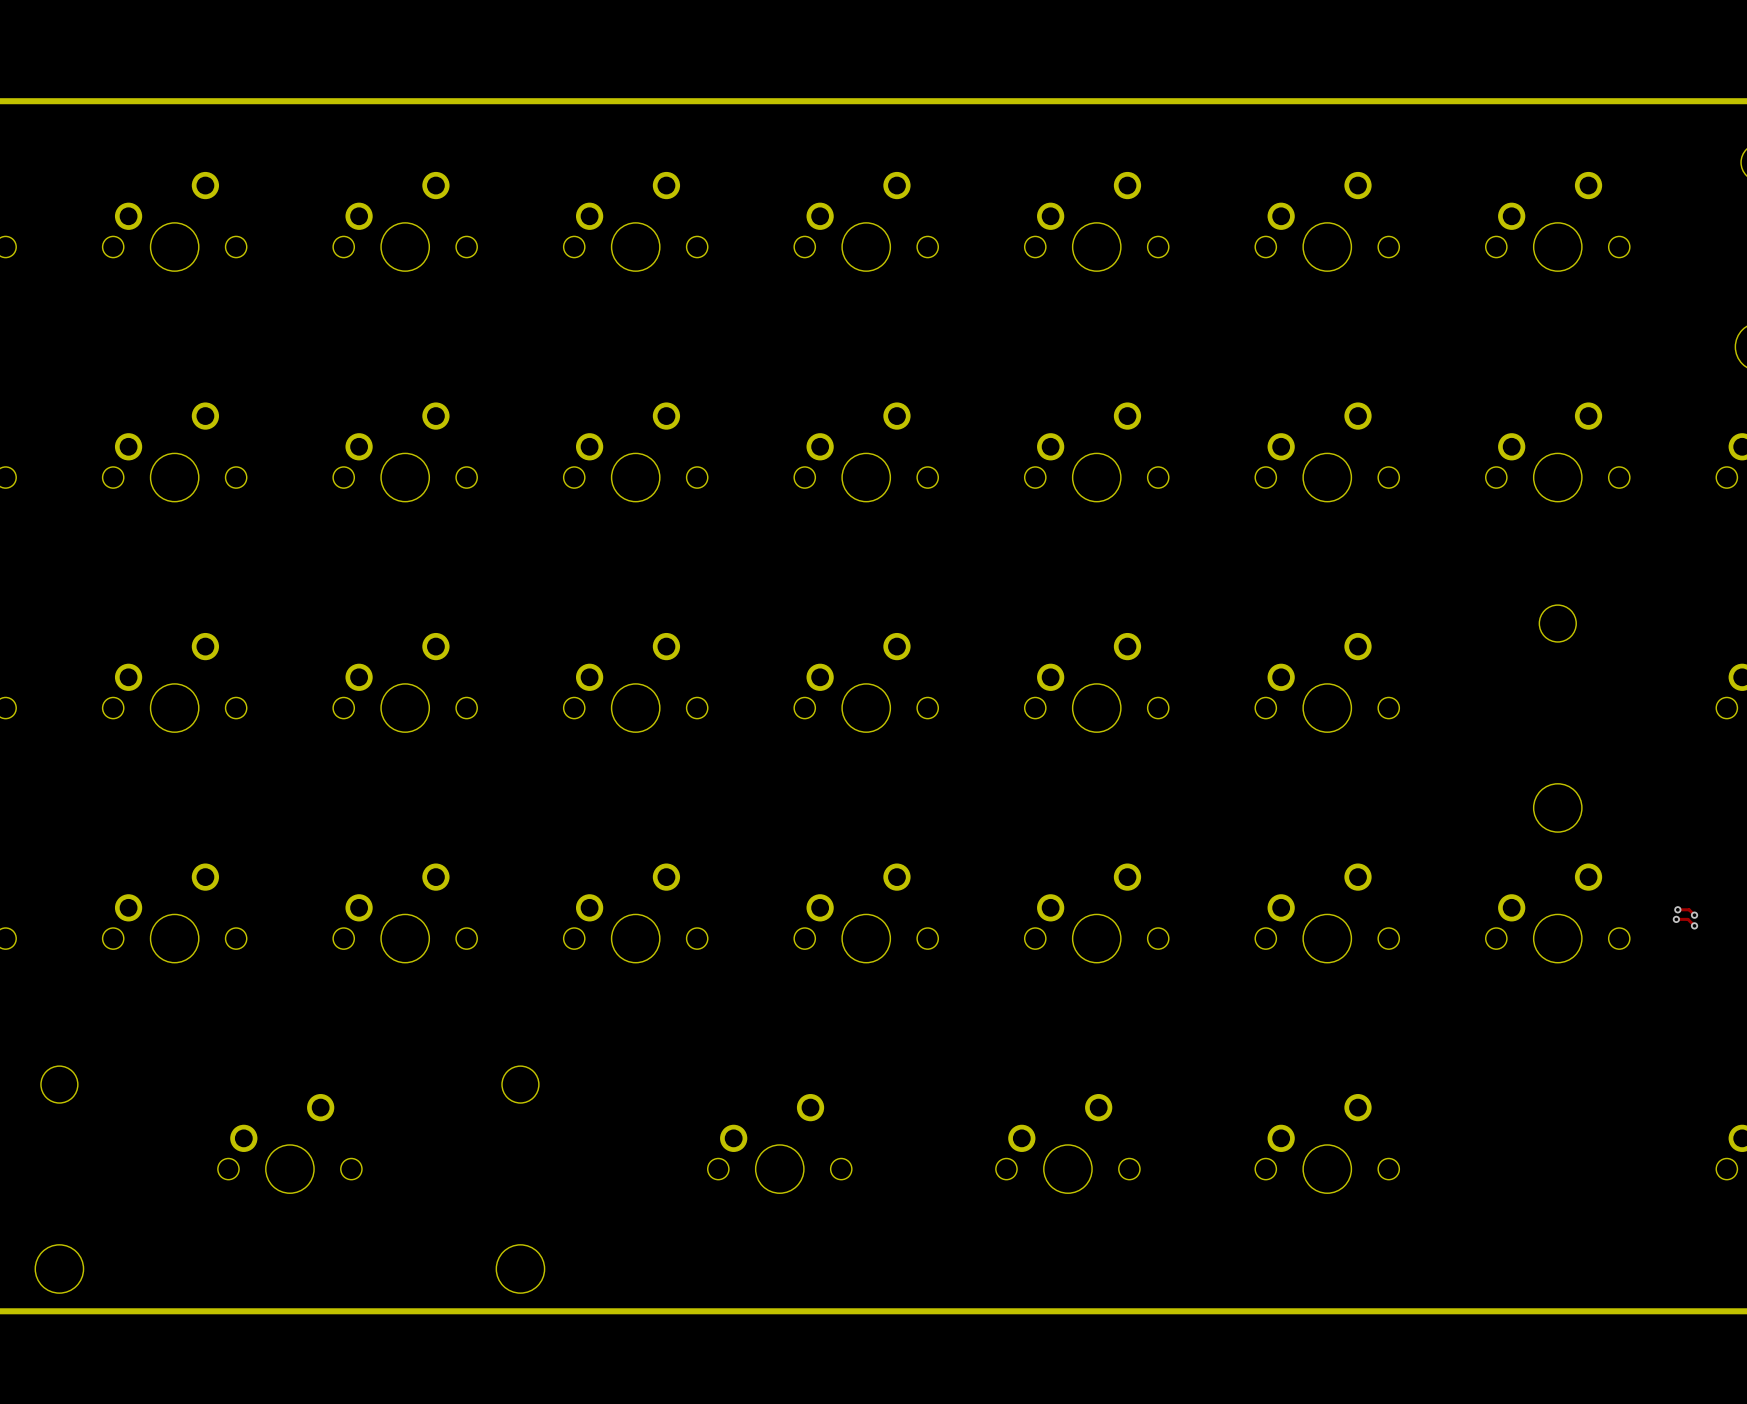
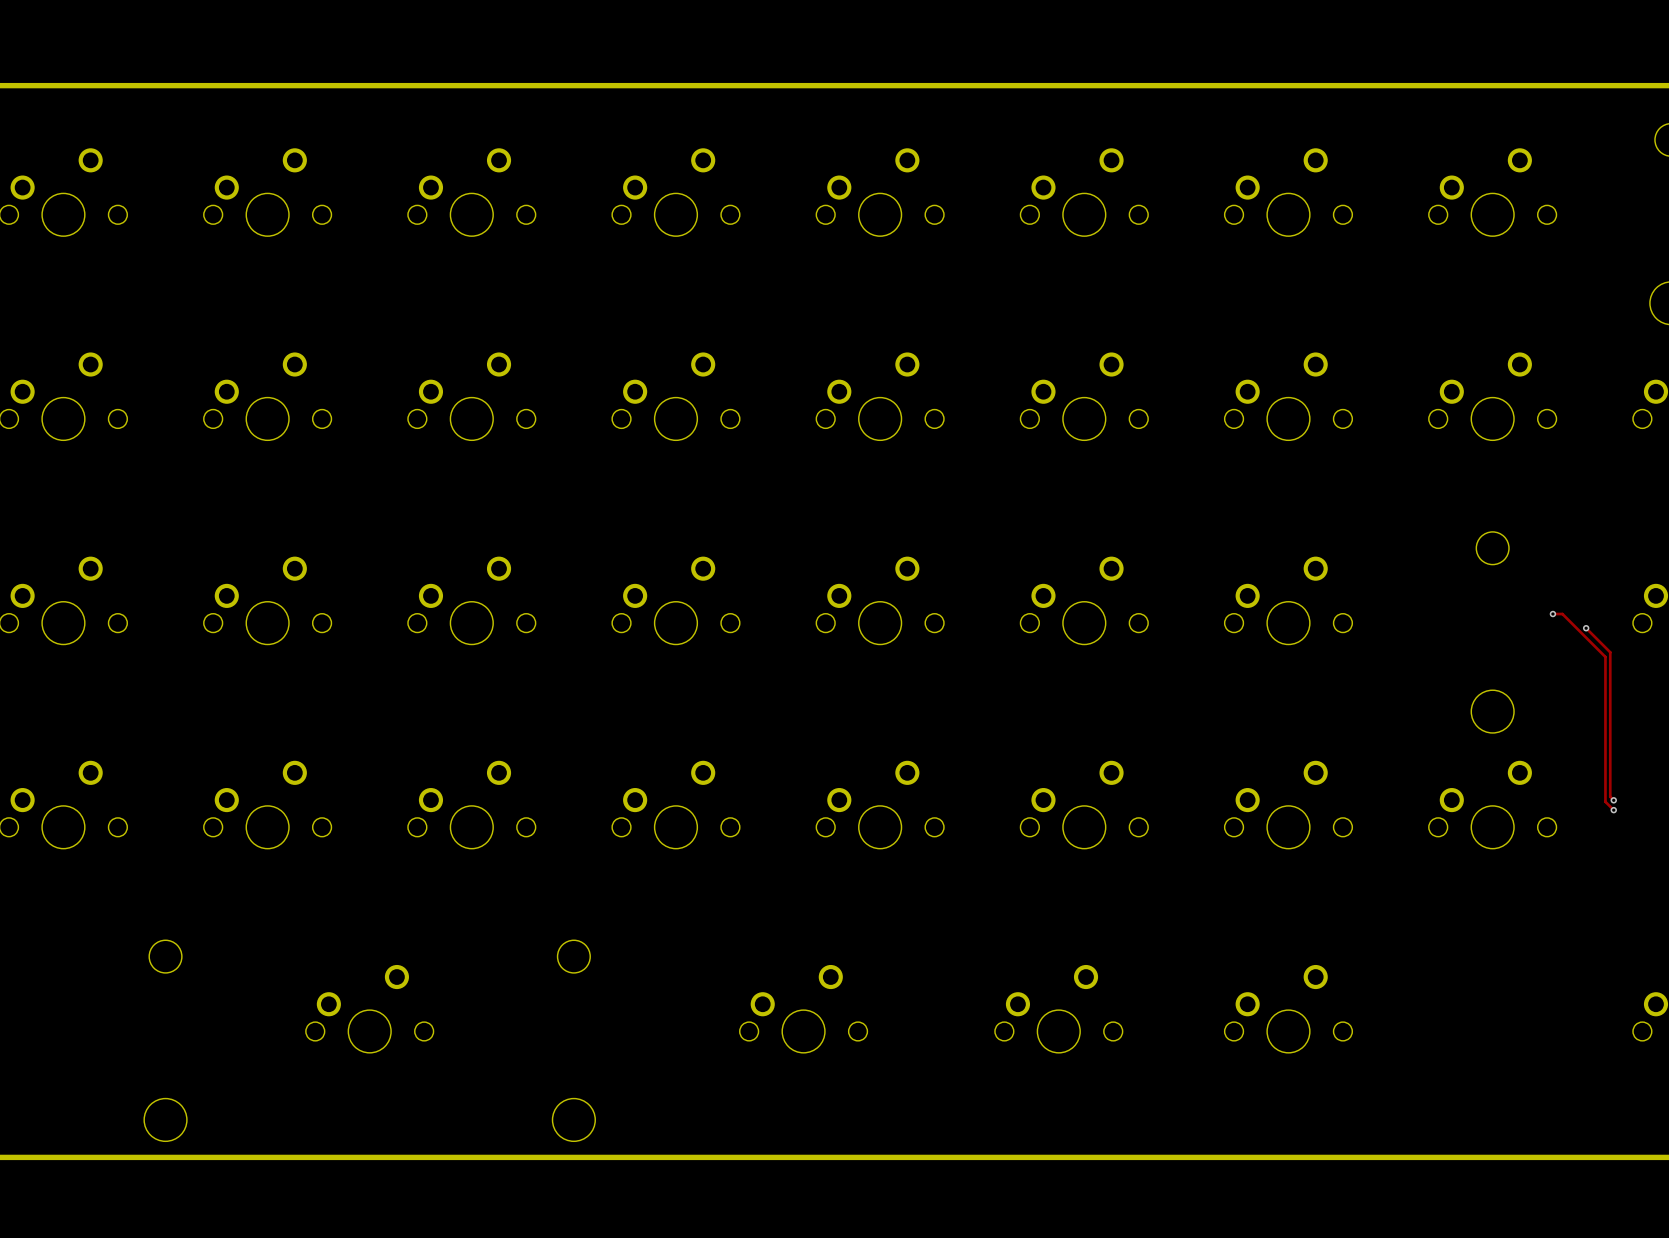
track: none -> (1552, 614) (1562, 614) (1605, 656) (1605, 801) (1613, 810)
via: none -> (1552, 614)
track: none -> (1586, 628) (1610, 652) (1610, 796) (1613, 800)
via: none -> (1586, 628)
via: none -> (1613, 800)
track: (1677, 909) (1689, 909) (1694, 915) -> none
via: (1677, 909) -> none
via: (1694, 915) -> none
track: (1676, 919) (1688, 919) (1694, 925) -> none
via: (1676, 919) -> none
via: none -> (1613, 810)
via: (1694, 925) -> none

